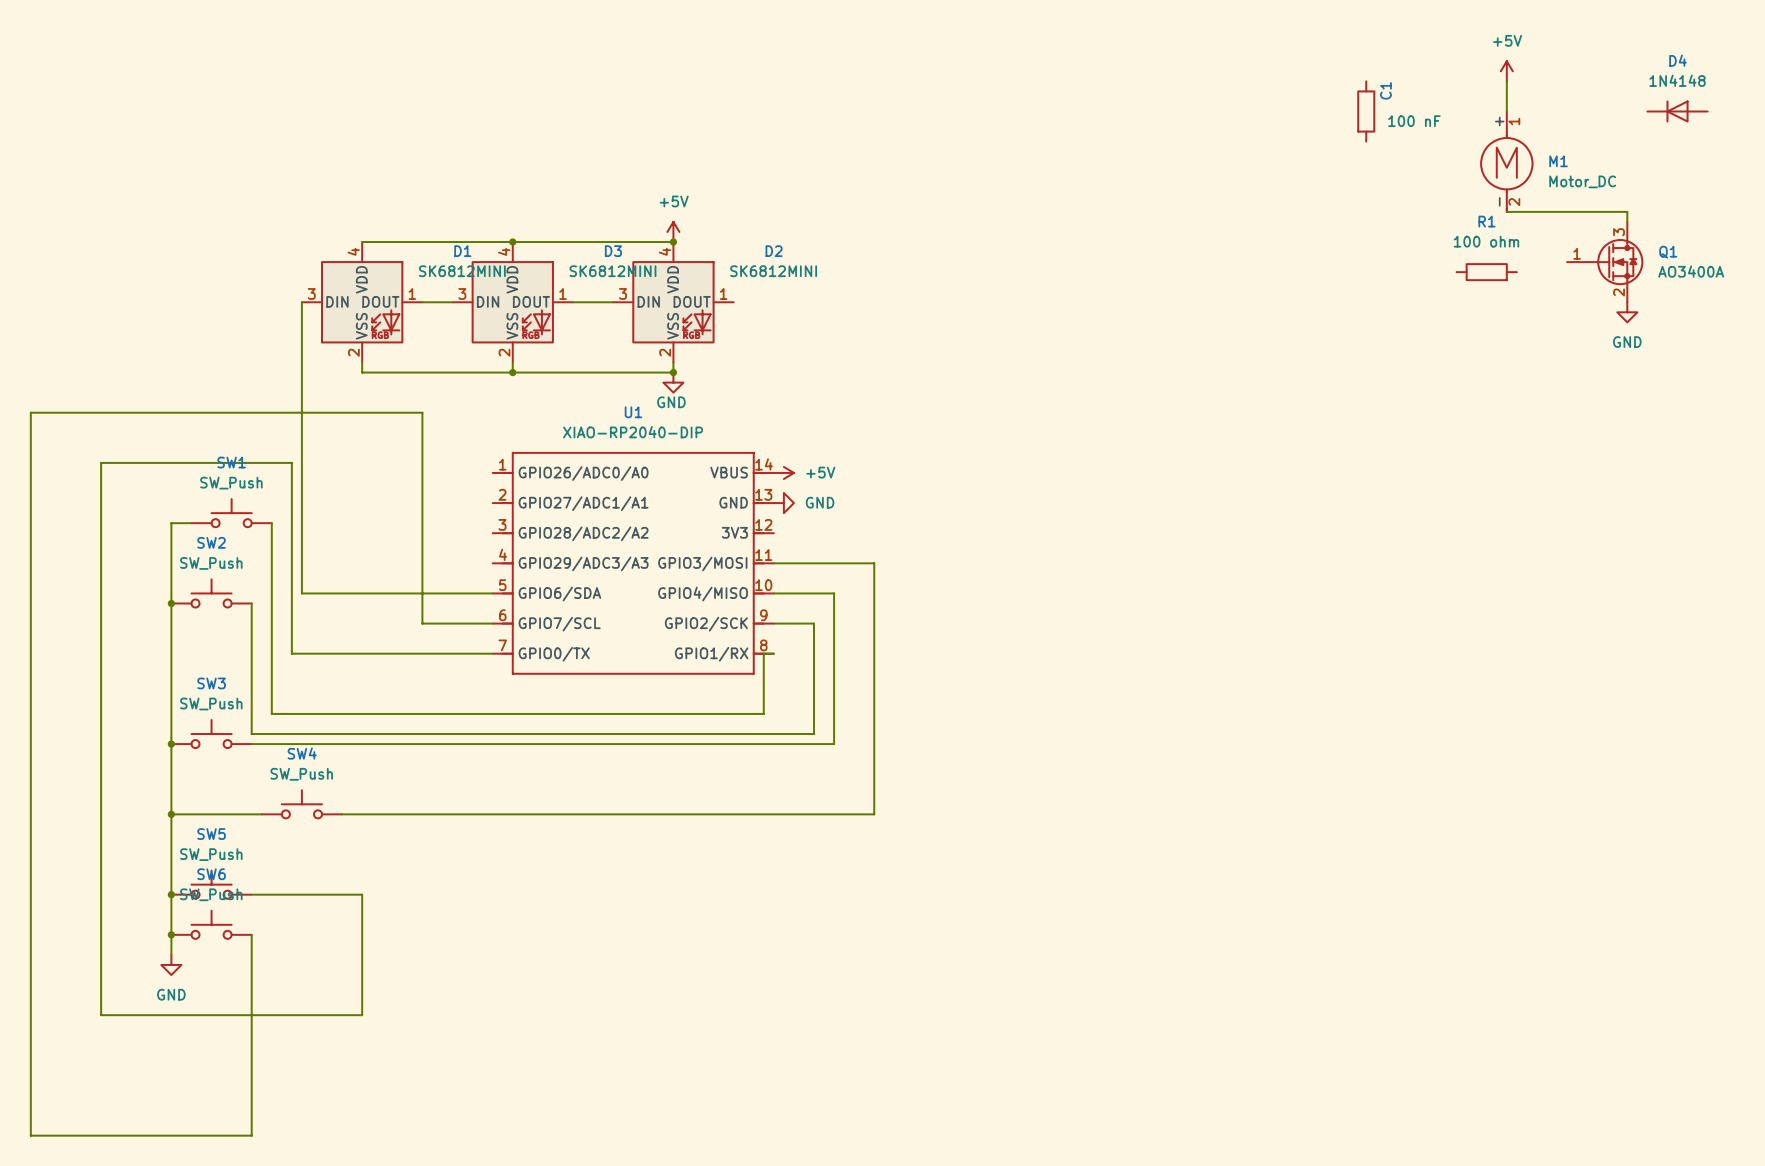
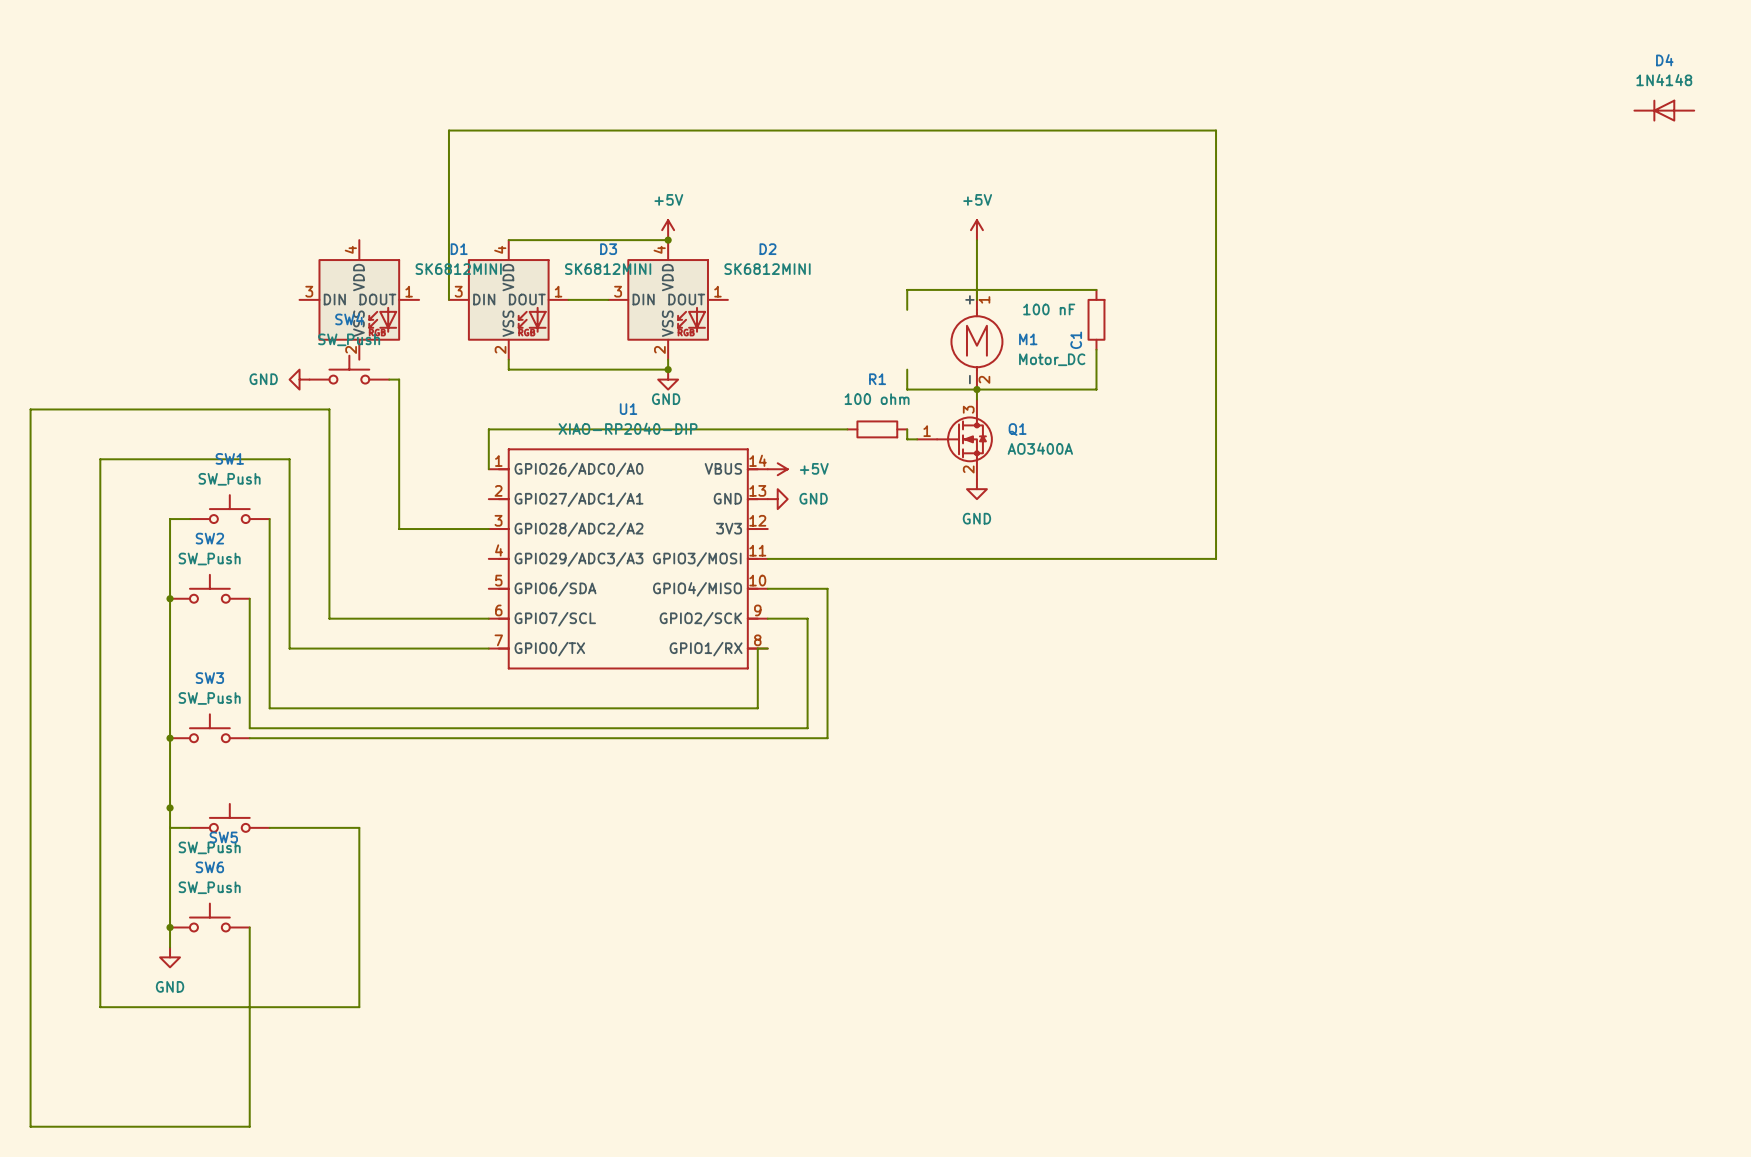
power symbol: +5V (1506, 71) -> none
wire: (1506, 81) (1506, 111) -> none
C1 name position: C1 (1385, 90) -> C1 (1076, 340)
C1 position: (1366, 111) -> (1096, 319)
C1 value position: 100 nF (1414, 121) -> 100 nF (1049, 309)
M1 position: (1506, 161) -> (976, 339)
wire: (1506, 211) (1627, 211) (1627, 221) -> none
power symbol: none -> +5V (976, 230)
wire: (362, 242) (512, 242) -> none
junction: (512, 242) -> none
wire: none -> (976, 240) (976, 299)
Q1 position: (1605, 262) -> (955, 439)
R1 position: (1486, 272) -> (877, 429)
wire: none -> (1096, 289) (907, 289) (907, 309)
wire: (301, 302) (301, 593) (492, 593) -> none
wire: (422, 302) (452, 302) -> (867, 558) (1216, 558) (1216, 130) (448, 130) (448, 299)
power symbol: GND (1627, 312) -> none
wire: none -> (1096, 349) (1096, 389) (907, 389) (907, 369)
wire: (362, 362) (362, 372) (512, 372) -> none
junction: (512, 372) -> none
power symbol: none -> GND (299, 379)
wire: none -> (389, 379) (399, 379) (399, 529) (488, 529)
wire: none -> (976, 389) (976, 399)
junction: none -> (976, 389)
wire: (332, 412) (422, 412) (422, 623) -> (329, 409) (329, 618) (419, 618)
wire: none -> (847, 429) (488, 429) (488, 469)
wire: none -> (907, 429) (907, 439) (917, 439)
power symbol: none -> GND (976, 489)
wire: (874, 563) (874, 814) (342, 814) -> none
SW4 position: (301, 804) -> (349, 369)
wire: (171, 814) (261, 814) -> none
wire: none -> (170, 827) (189, 827)
SW5 name position: SW5 (211, 834) -> SW5 (223, 837)
SW5 position: (211, 884) -> (229, 817)
junction: (171, 894) -> none
wire: (251, 894) (362, 894) -> (269, 827) (359, 827) (359, 887)

